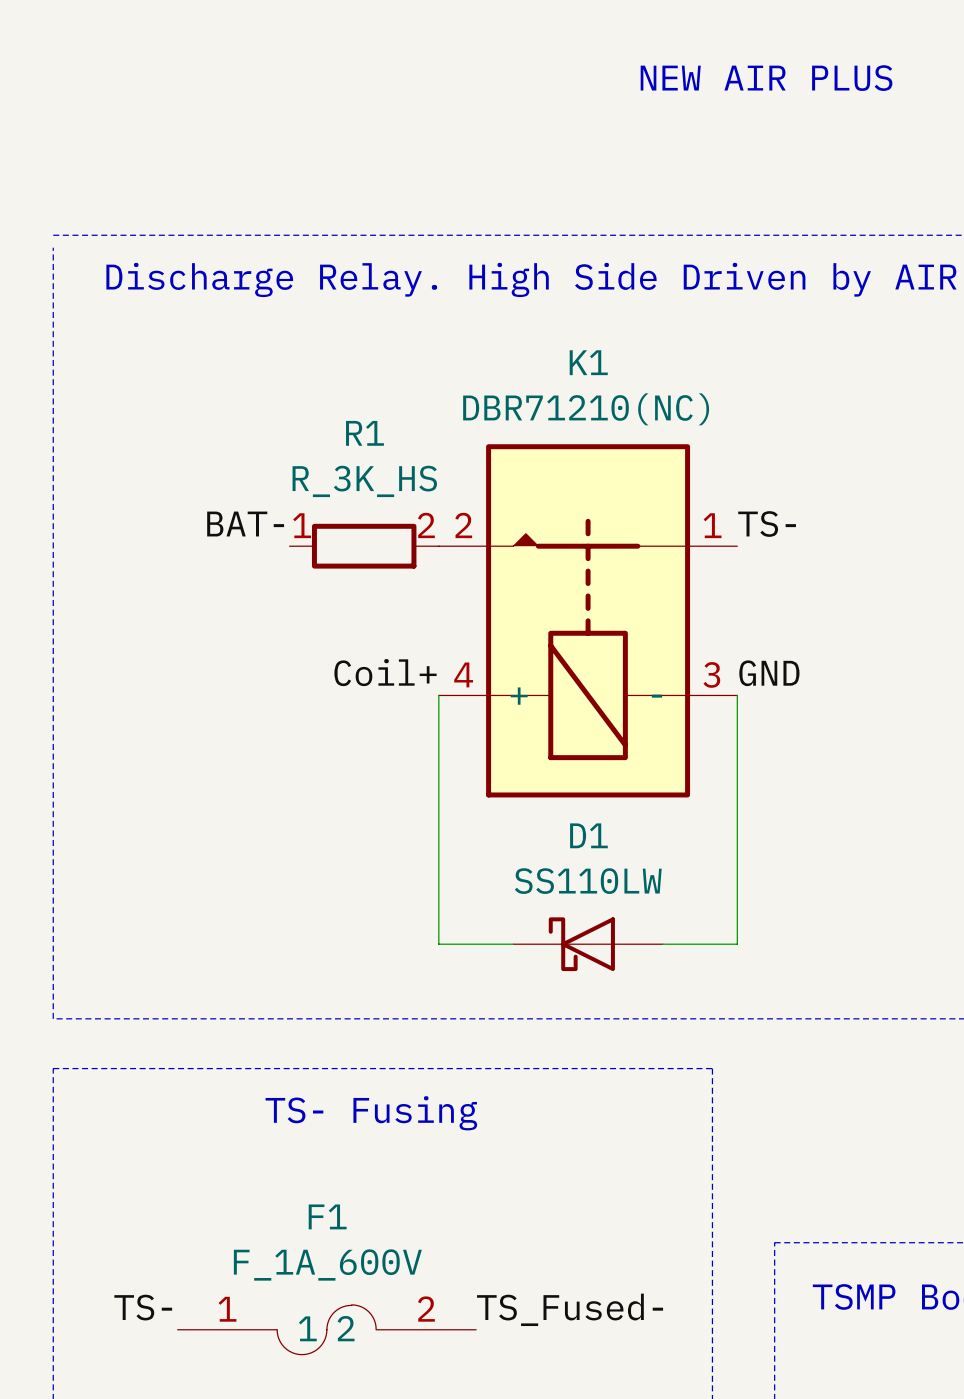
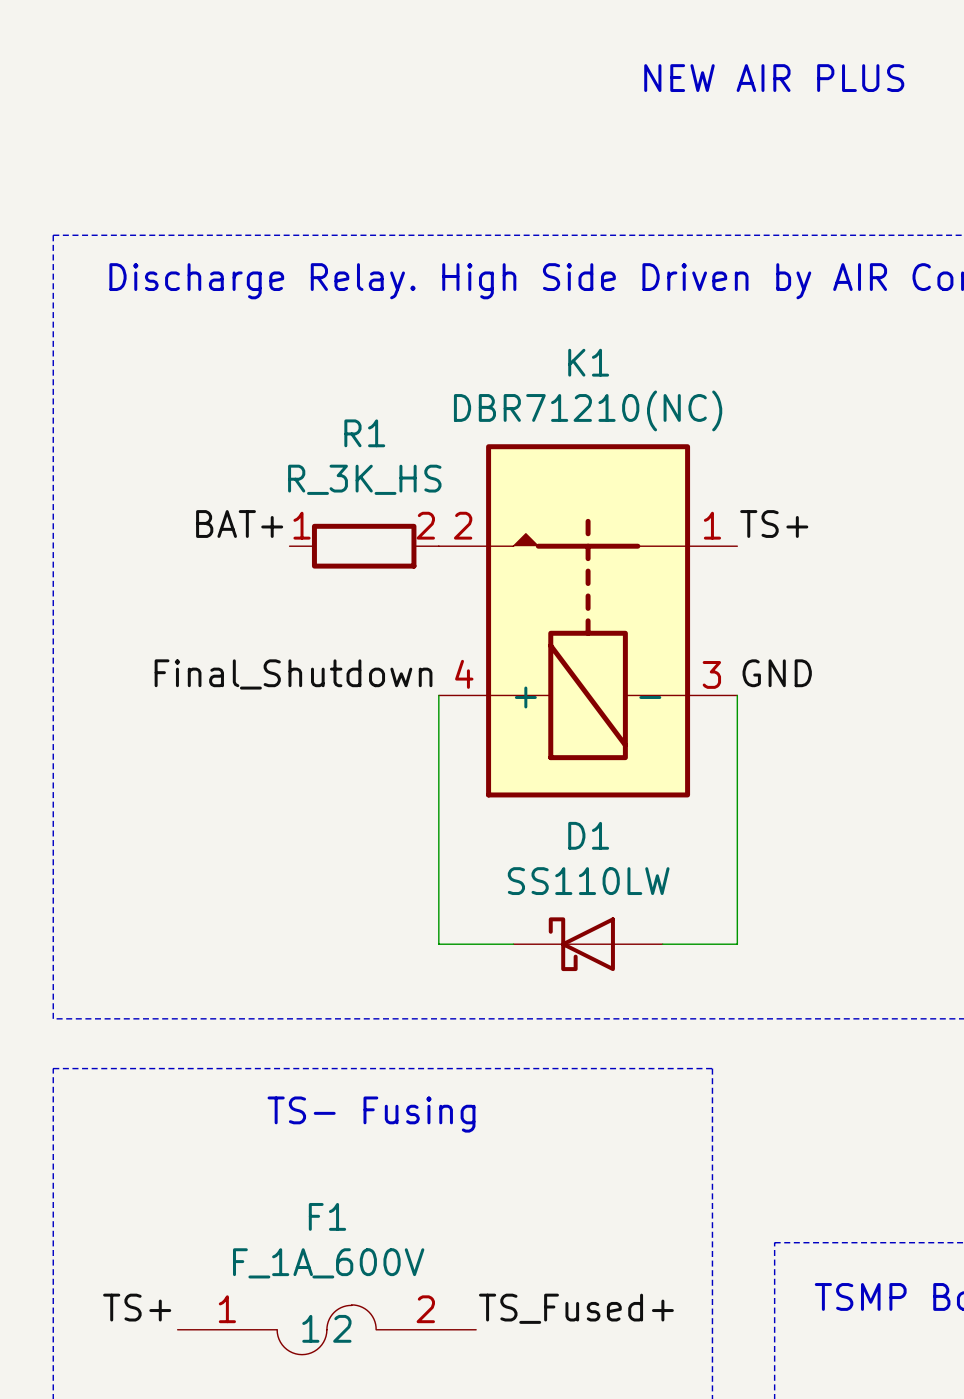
line: none -> (53, 235) (53, 247)
label: BAT- (245, 524) -> BAT+ (239, 524)
label: TS- (767, 524) -> TS+ (774, 524)
label: Coil+ (385, 672) -> Final_Shutdown (293, 674)
label: TS- (143, 1307) -> TS+ (137, 1307)
label: TS_Fused- (570, 1309) -> TS_Fused+ (576, 1308)

